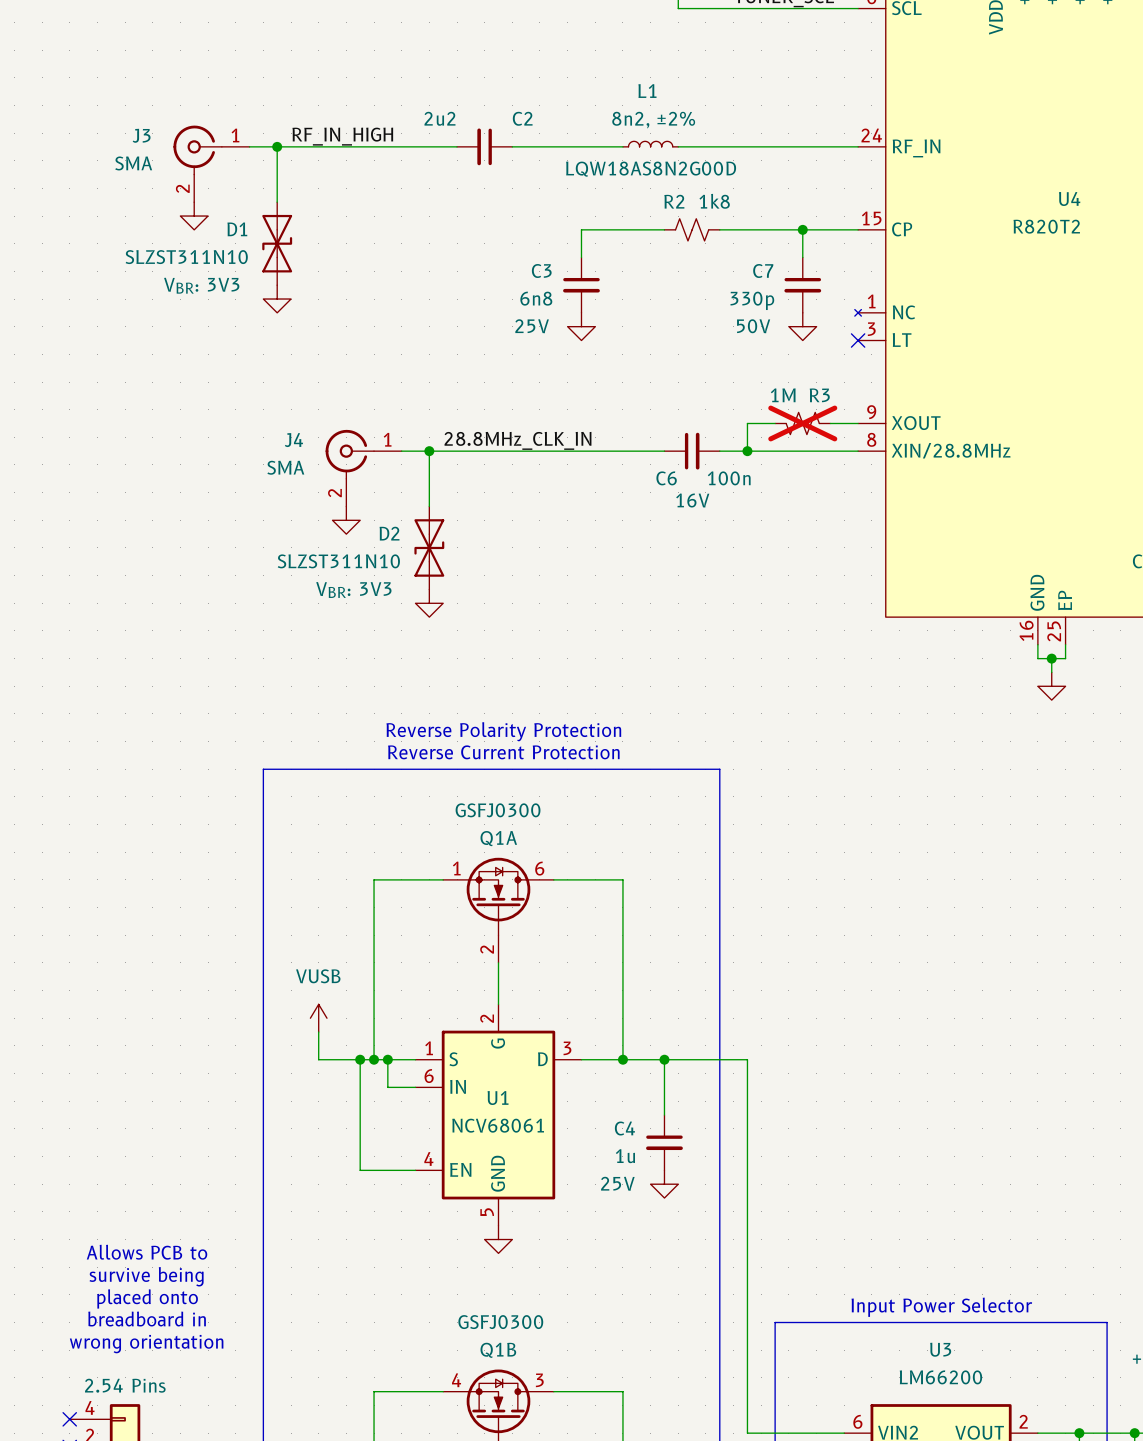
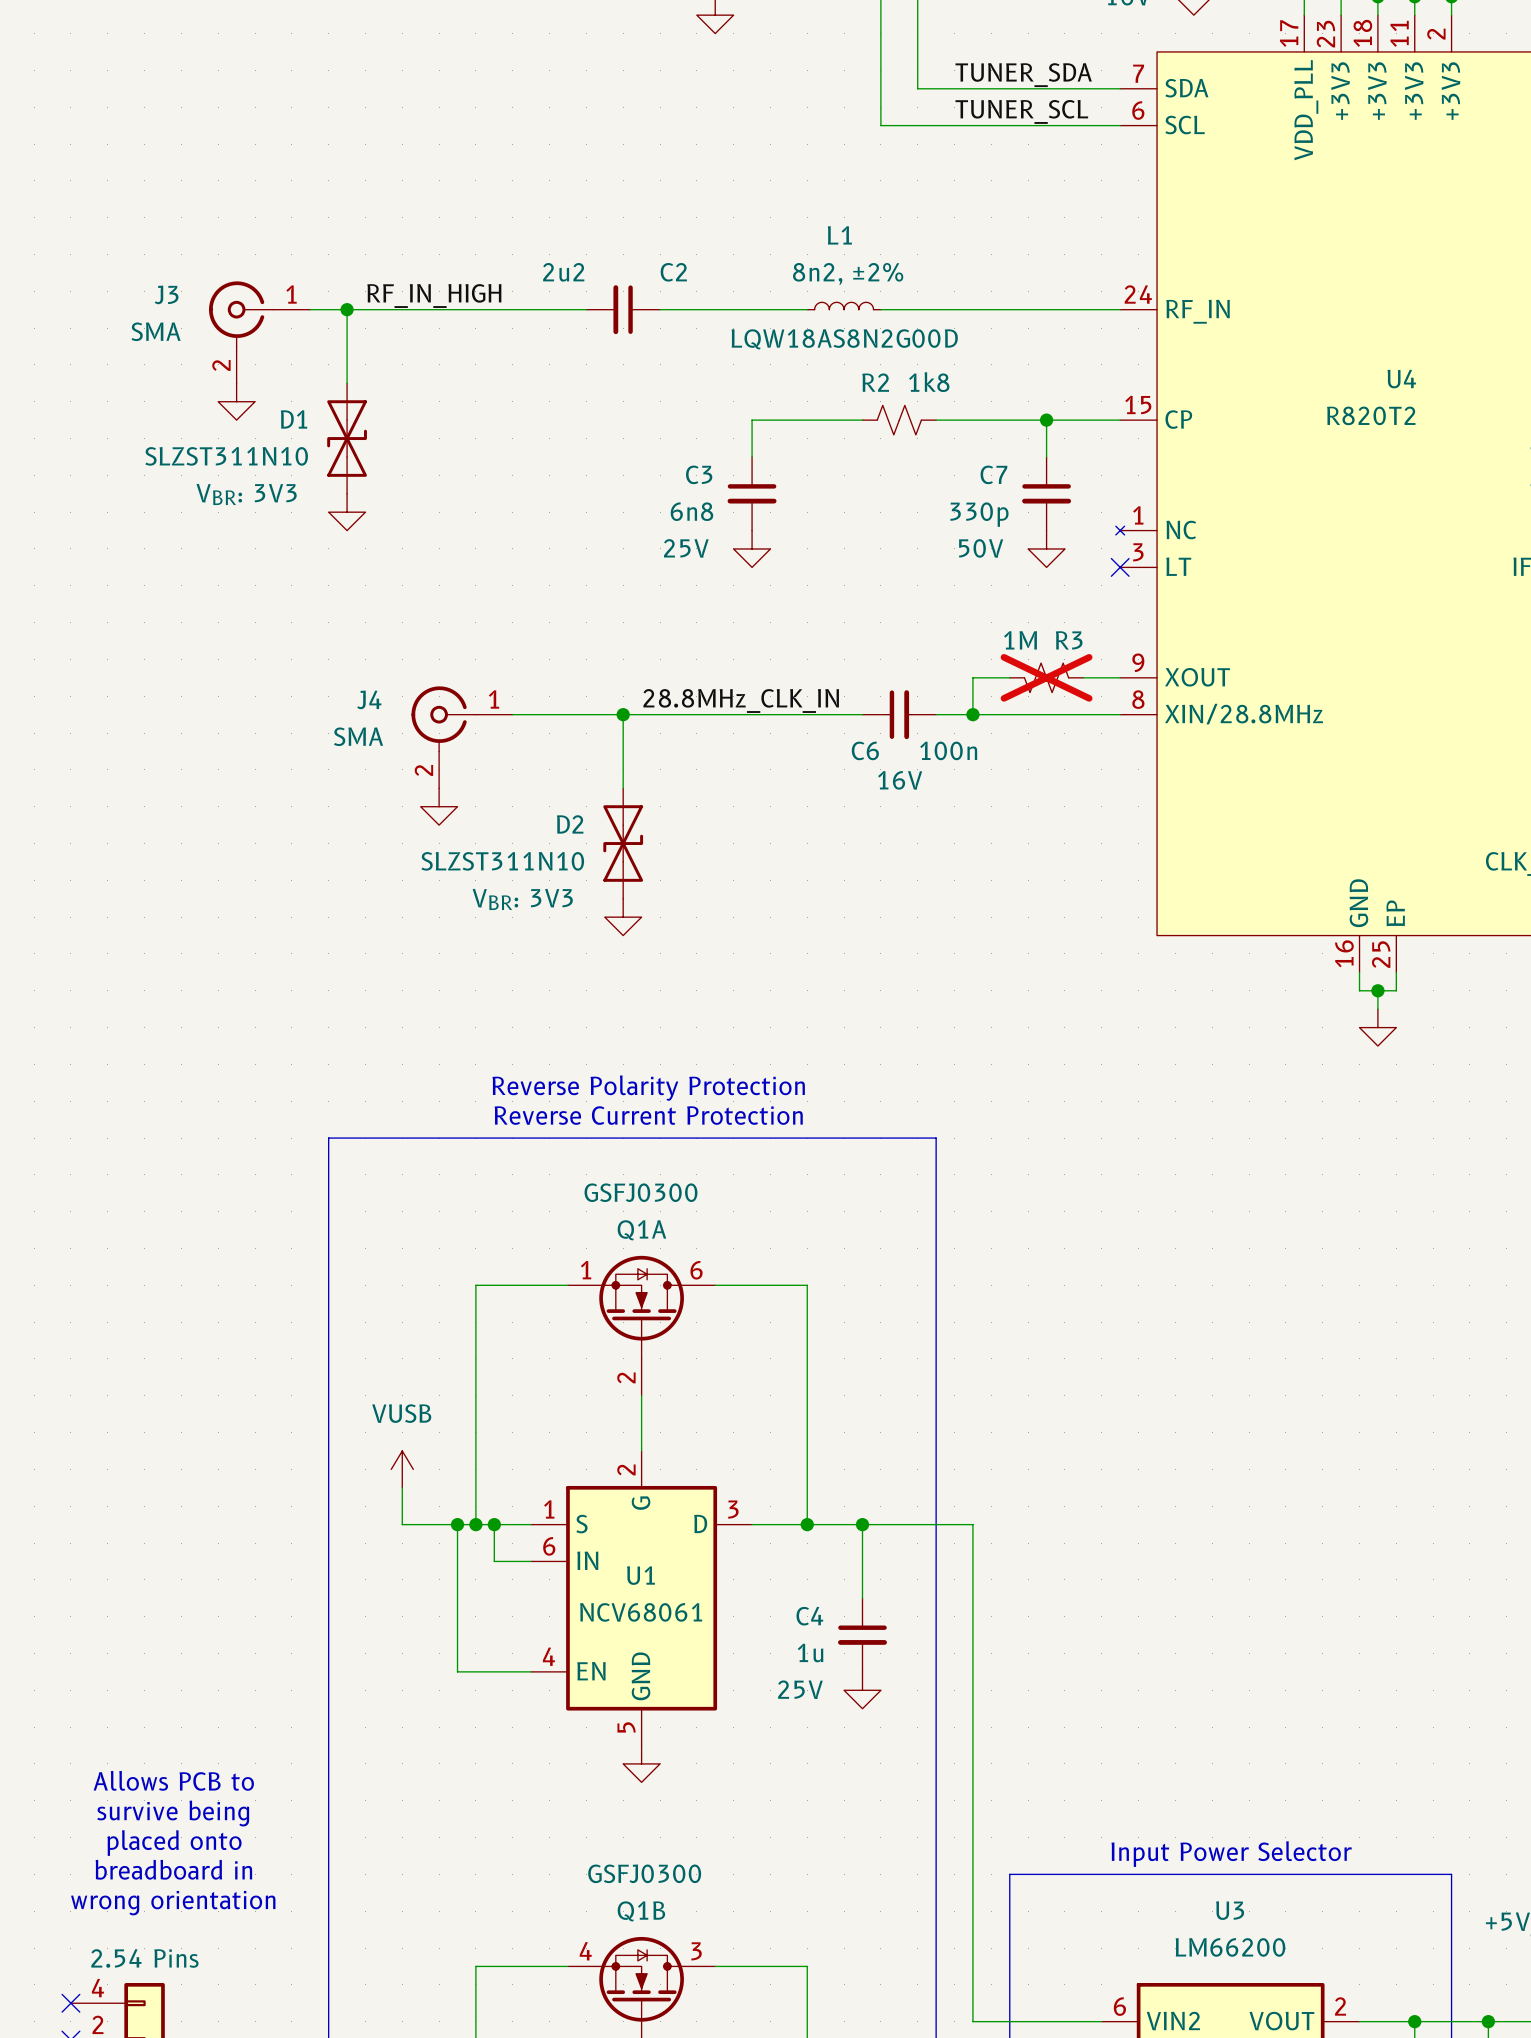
label position: 28.8MHz_CLK_IN (518, 440) -> 28.8MHz_CLK_IN (741, 700)
wire: (429, 451) (429, 506) -> (623, 714) (623, 788)
junction position: (429, 451) -> (623, 714)
D2 position: (429, 547) -> (623, 843)
power symbol position: (429, 603) -> (623, 917)

